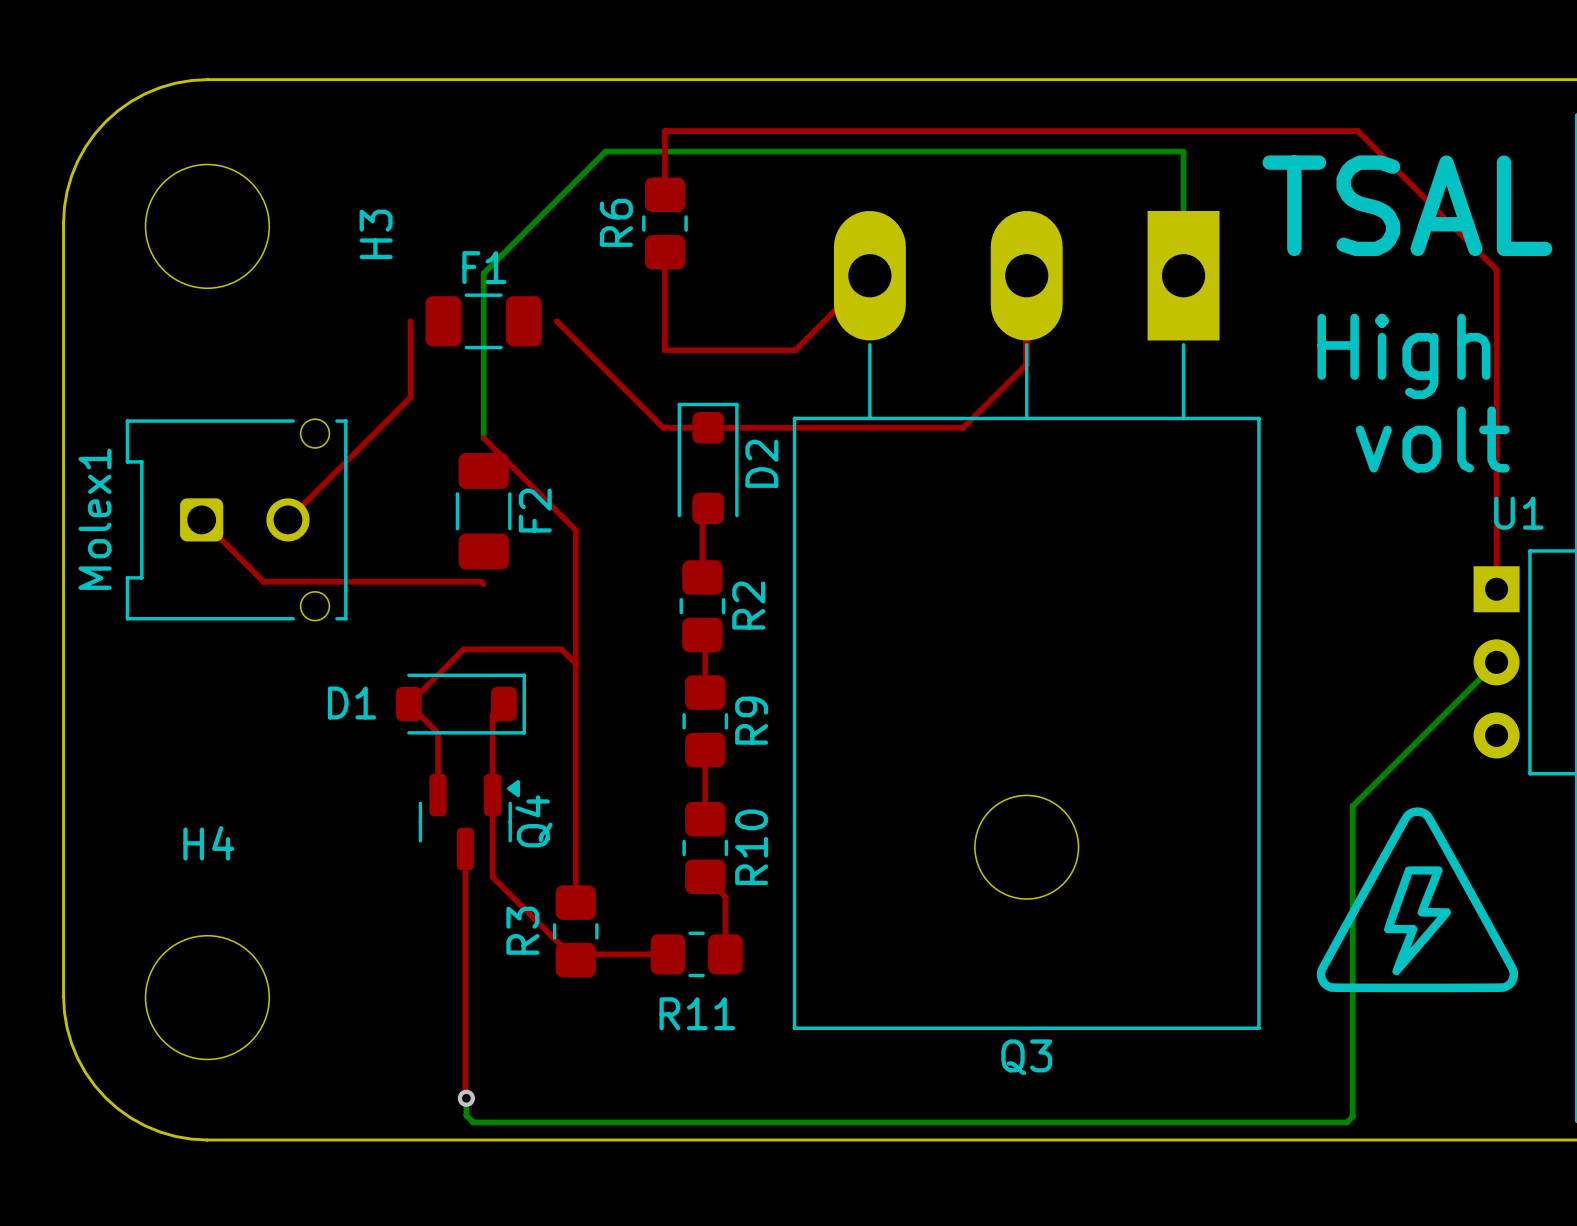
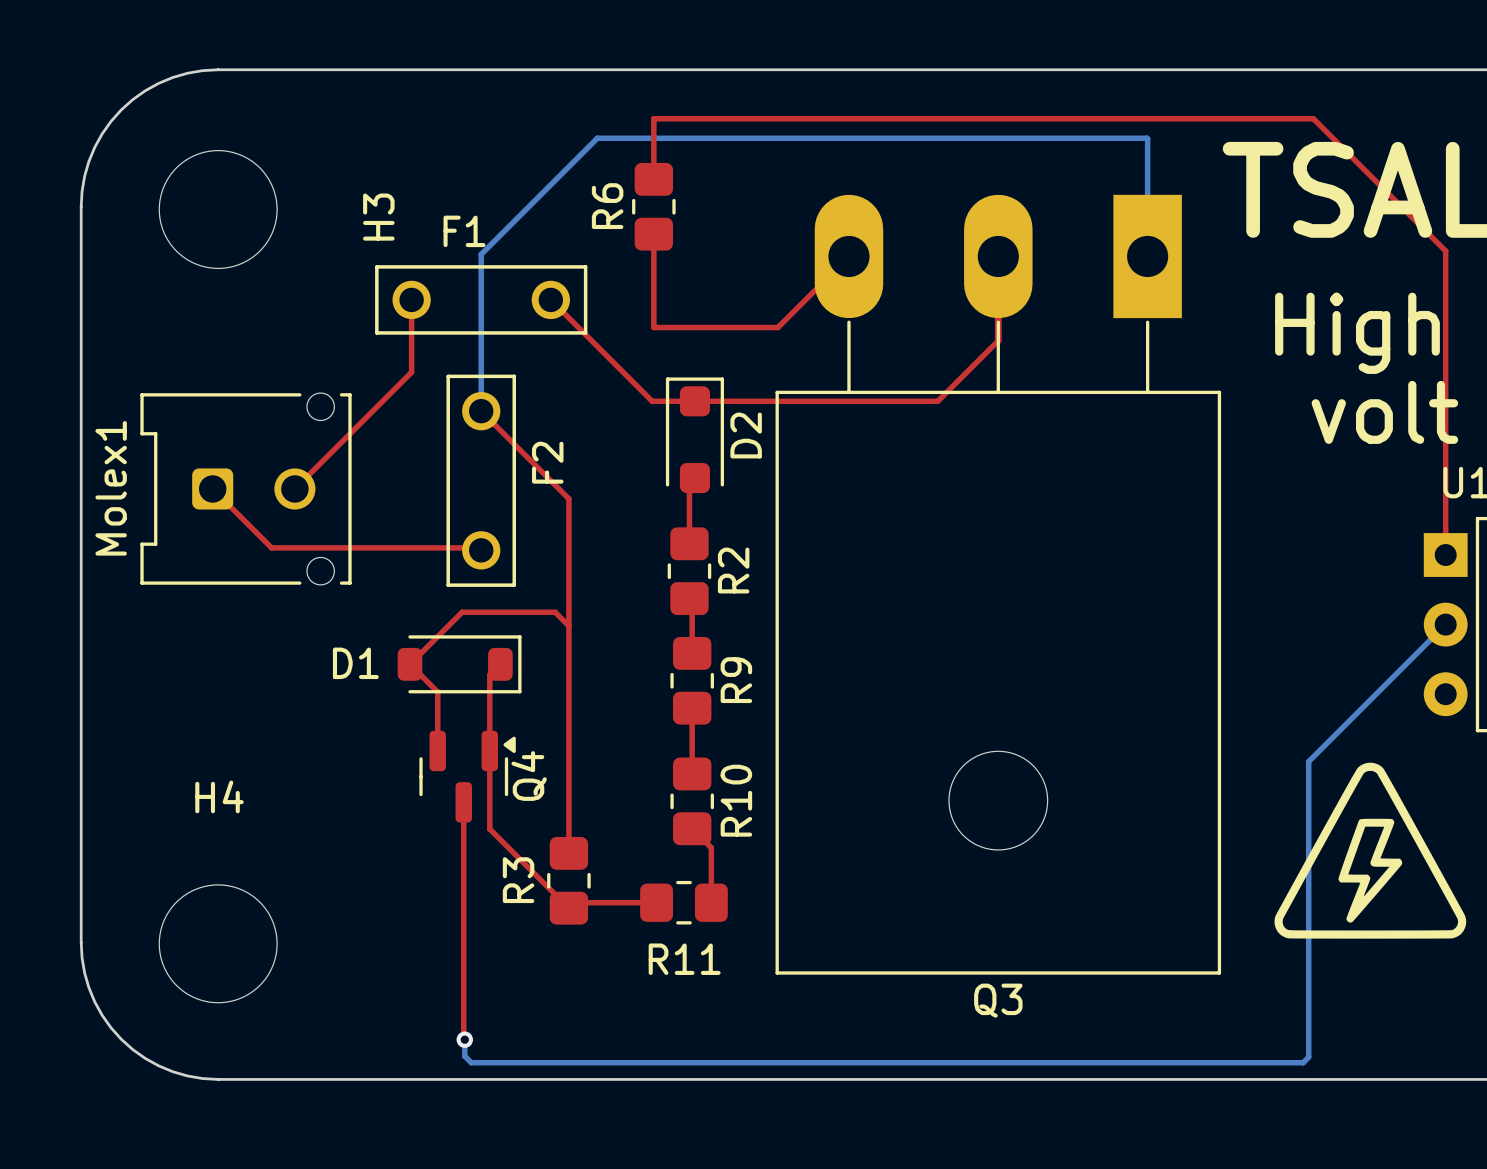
F1 footprint: [425, 293, 542, 350] -> [375, 265, 588, 335]
F2 footprint: [455, 453, 512, 570] -> [446, 374, 516, 587]

